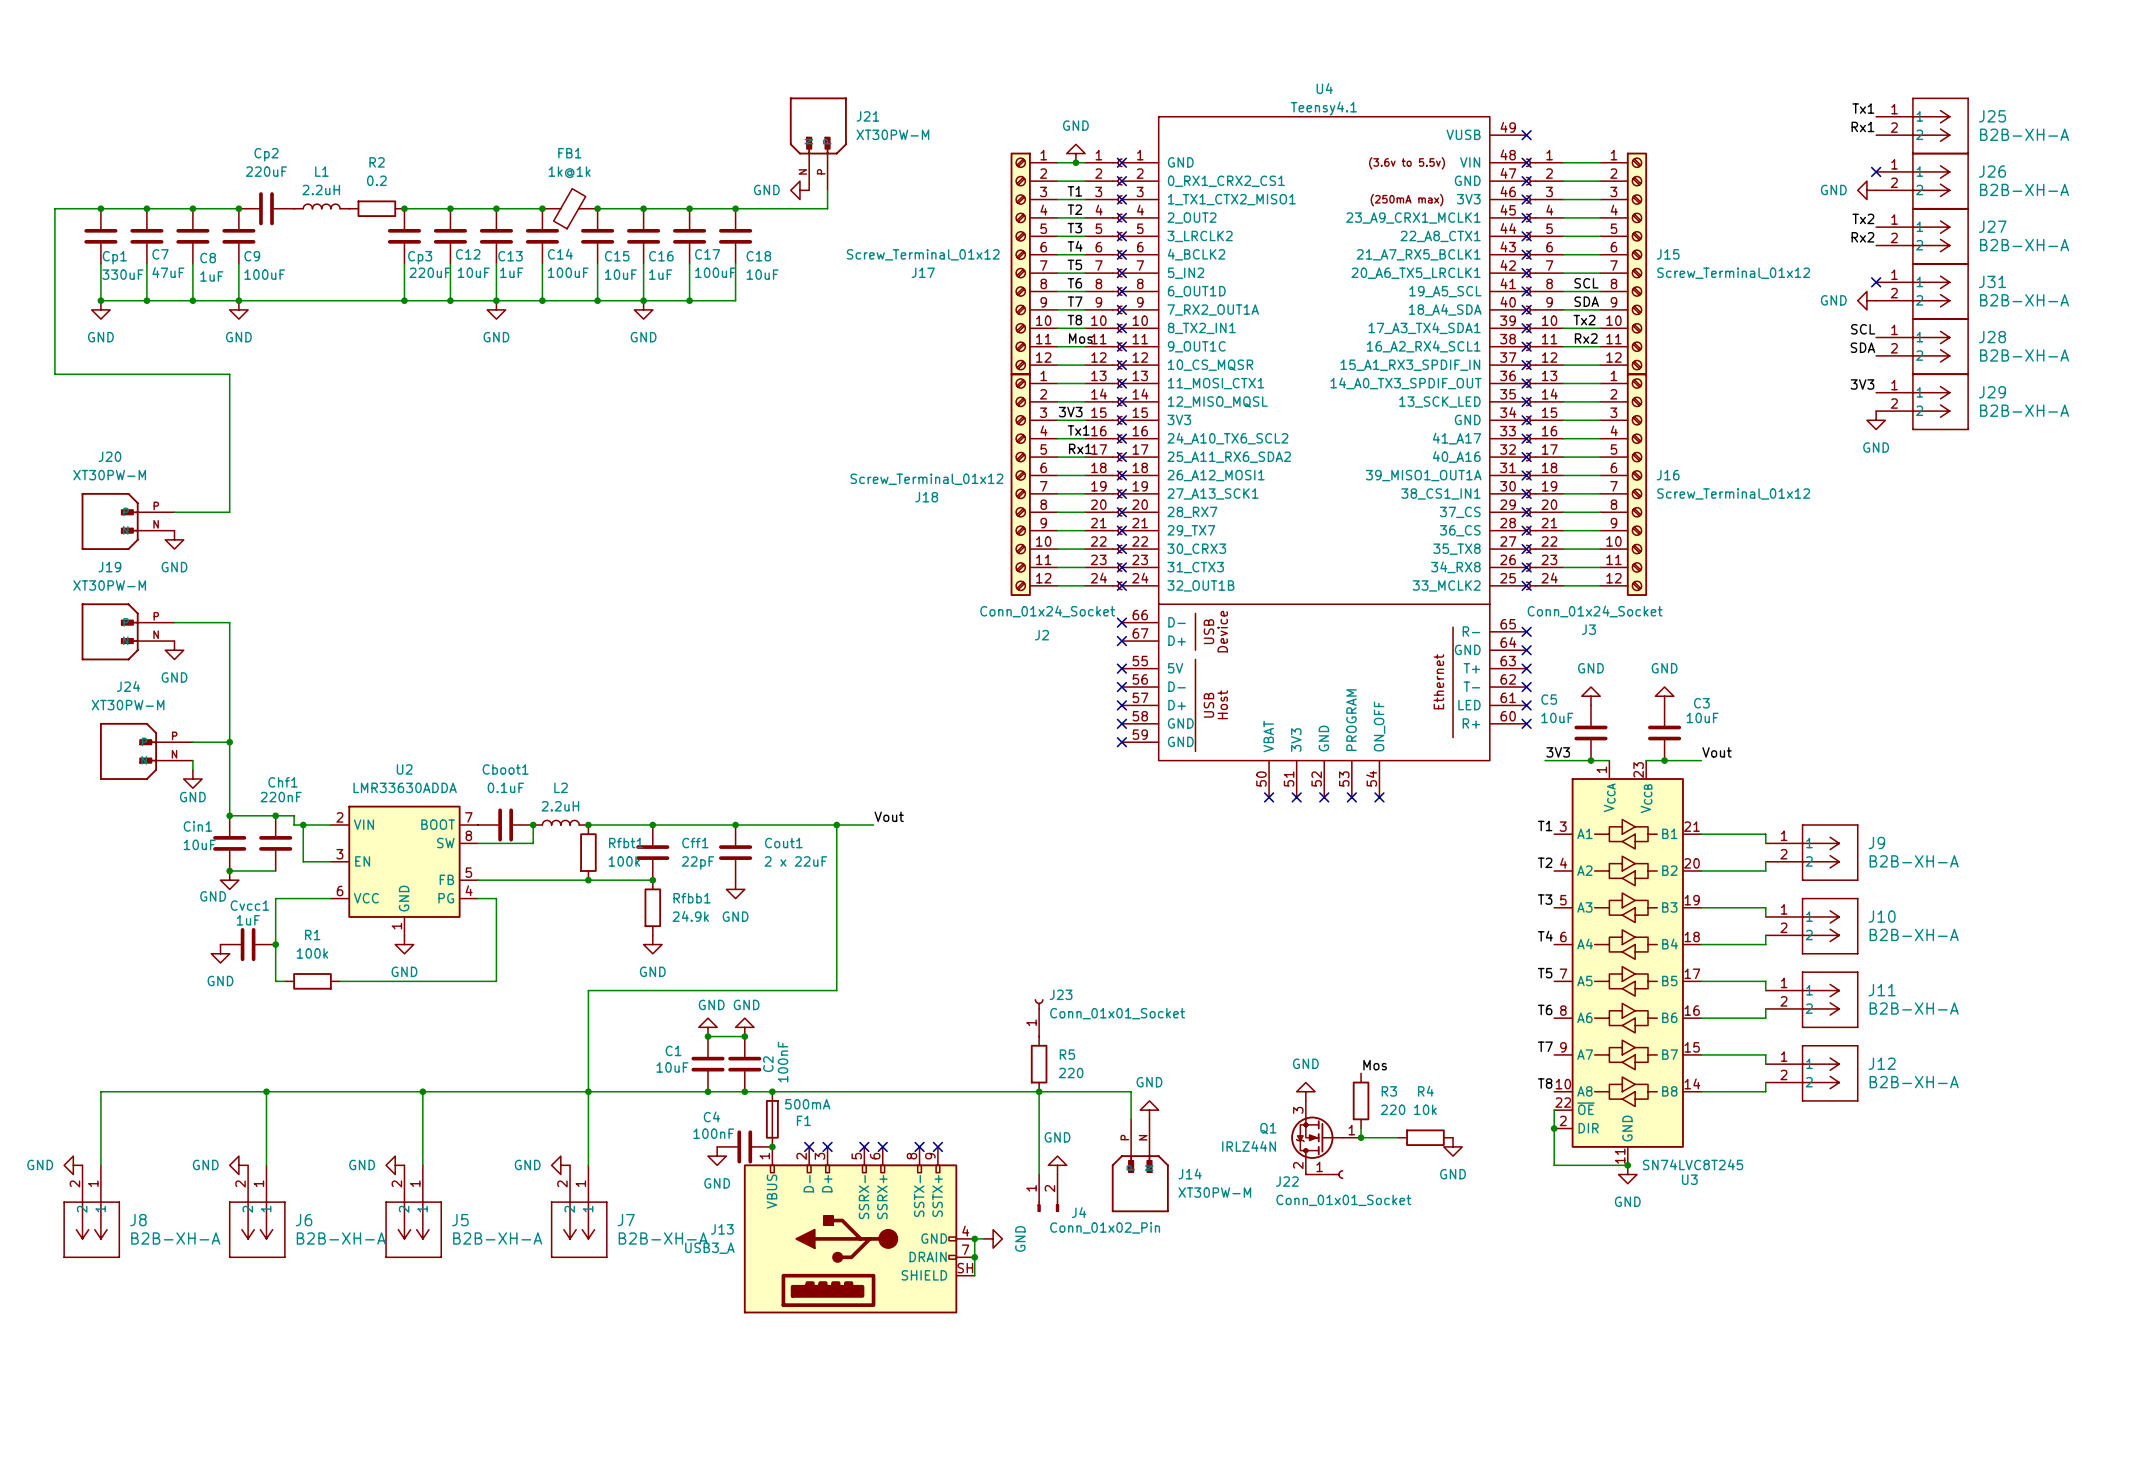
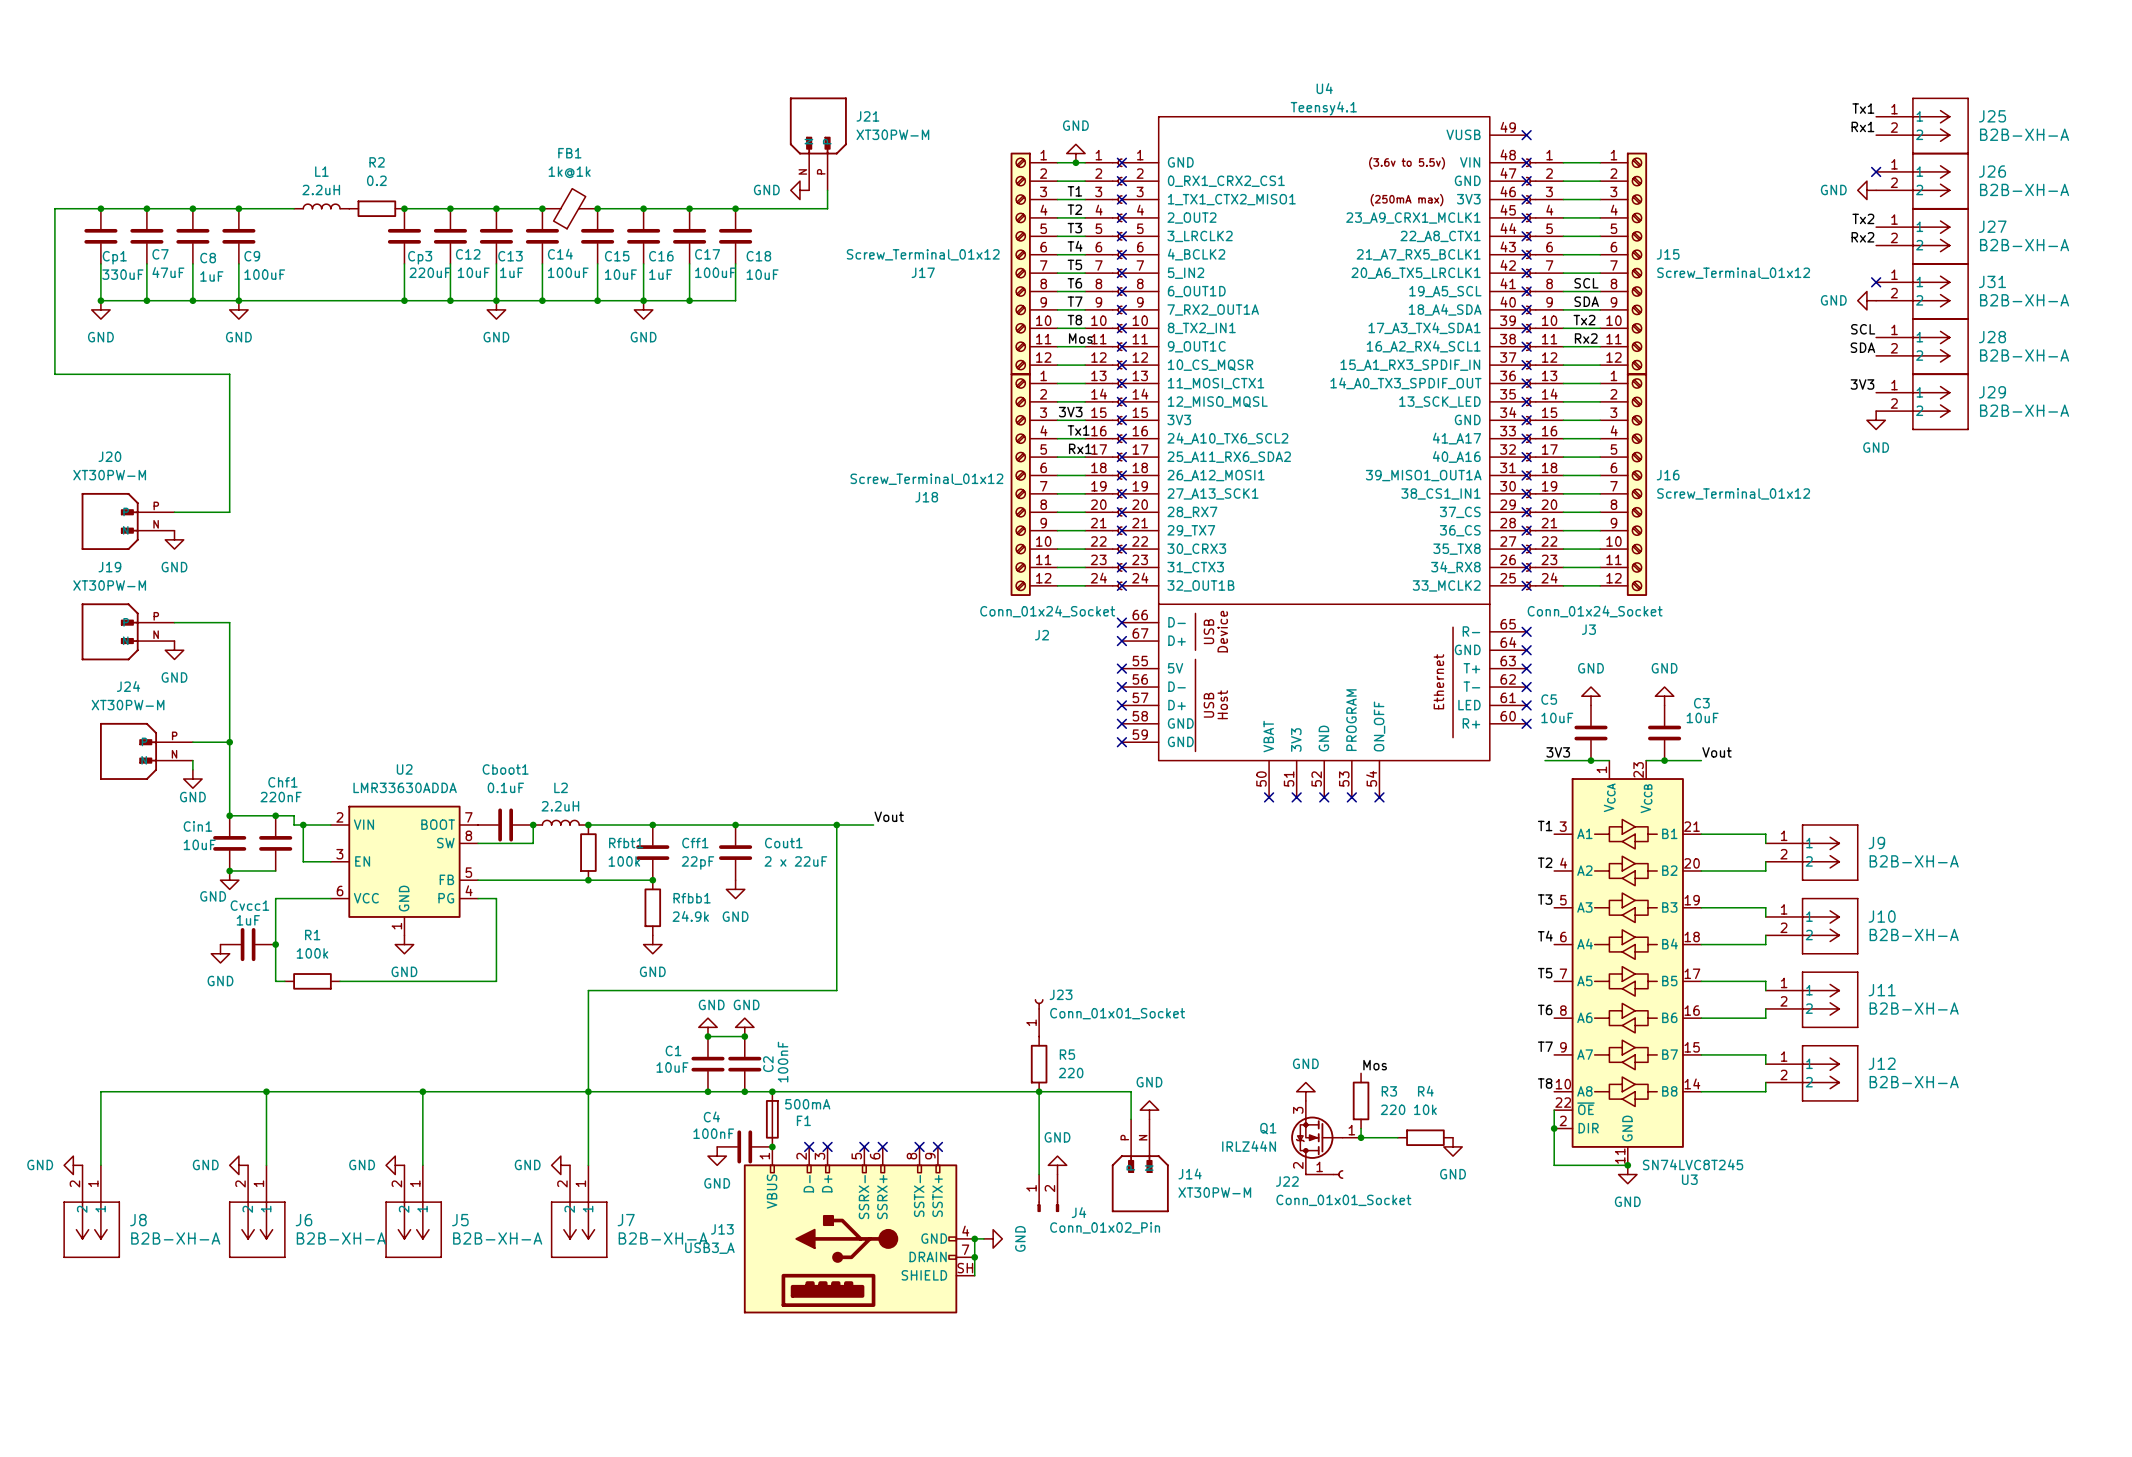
Cp2: 220uF (266, 208) -> none

